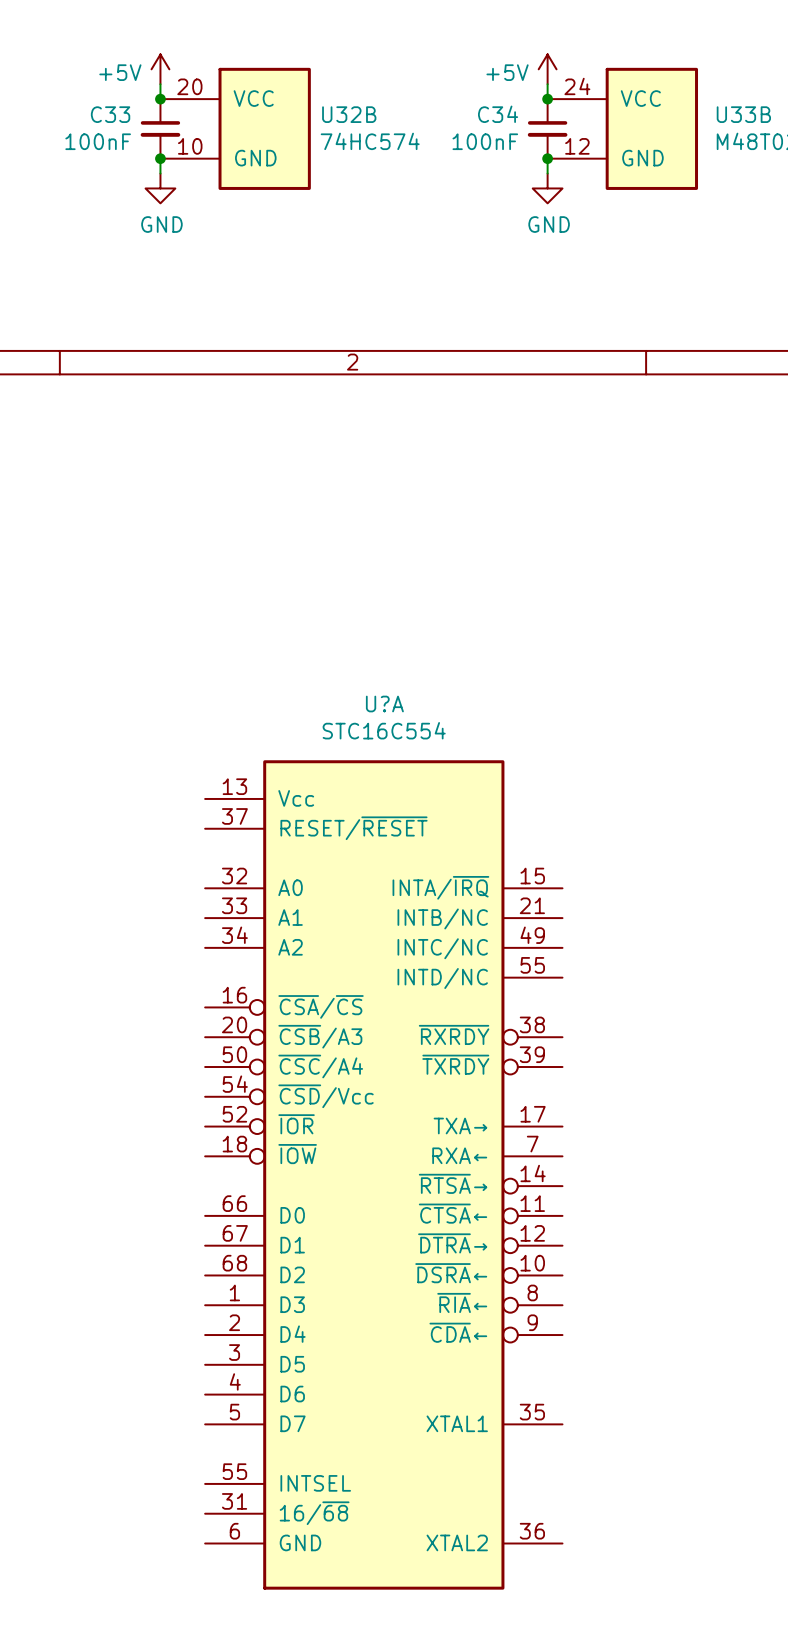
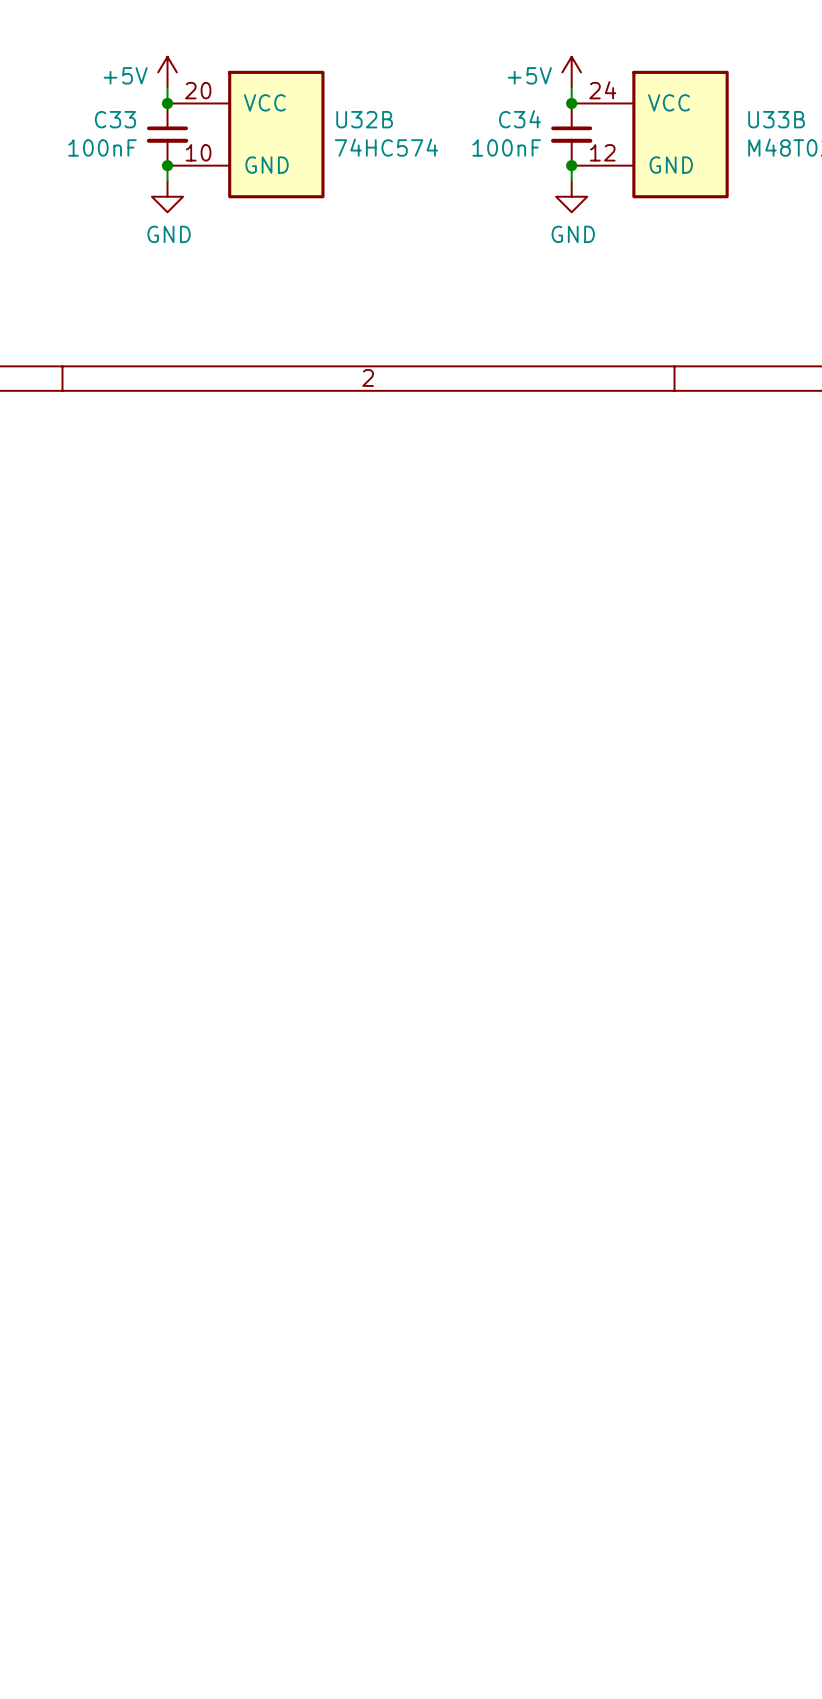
U?A: STC16C554 (383, 1174) -> none

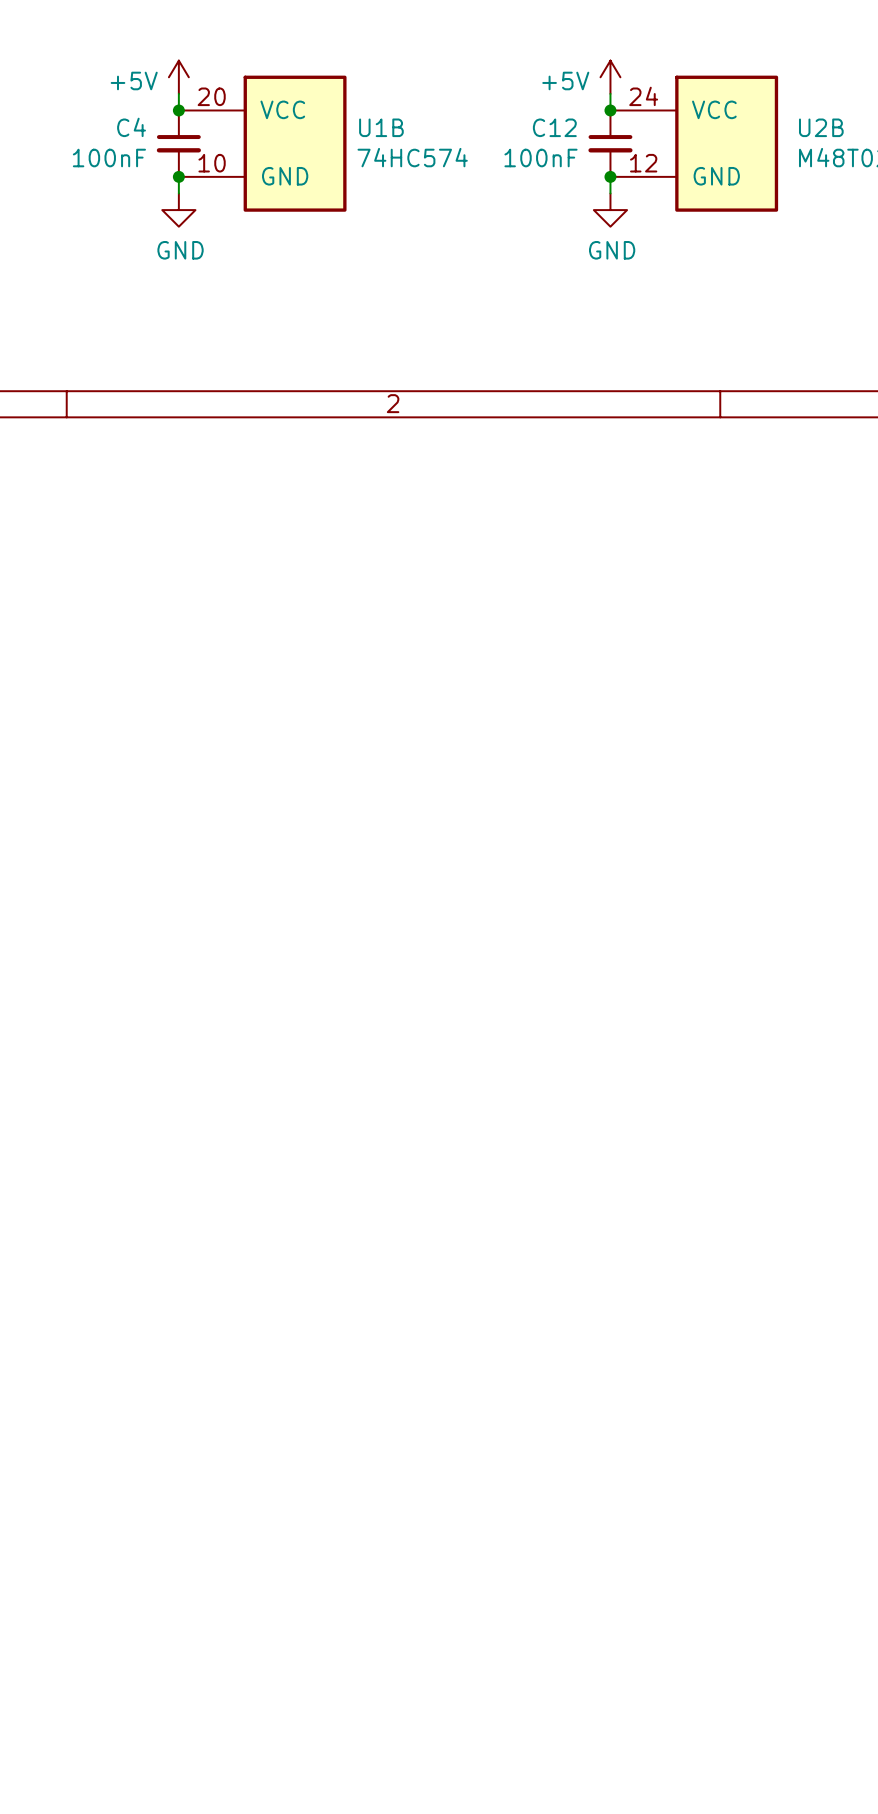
C33 name: C33 (115, 119) -> C4 (131, 127)
U32B name: U32B (364, 119) -> U1B (381, 127)
C34 name: C34 (519, 119) -> C12 (554, 127)
U33B name: U33B (776, 119) -> U2B (821, 127)

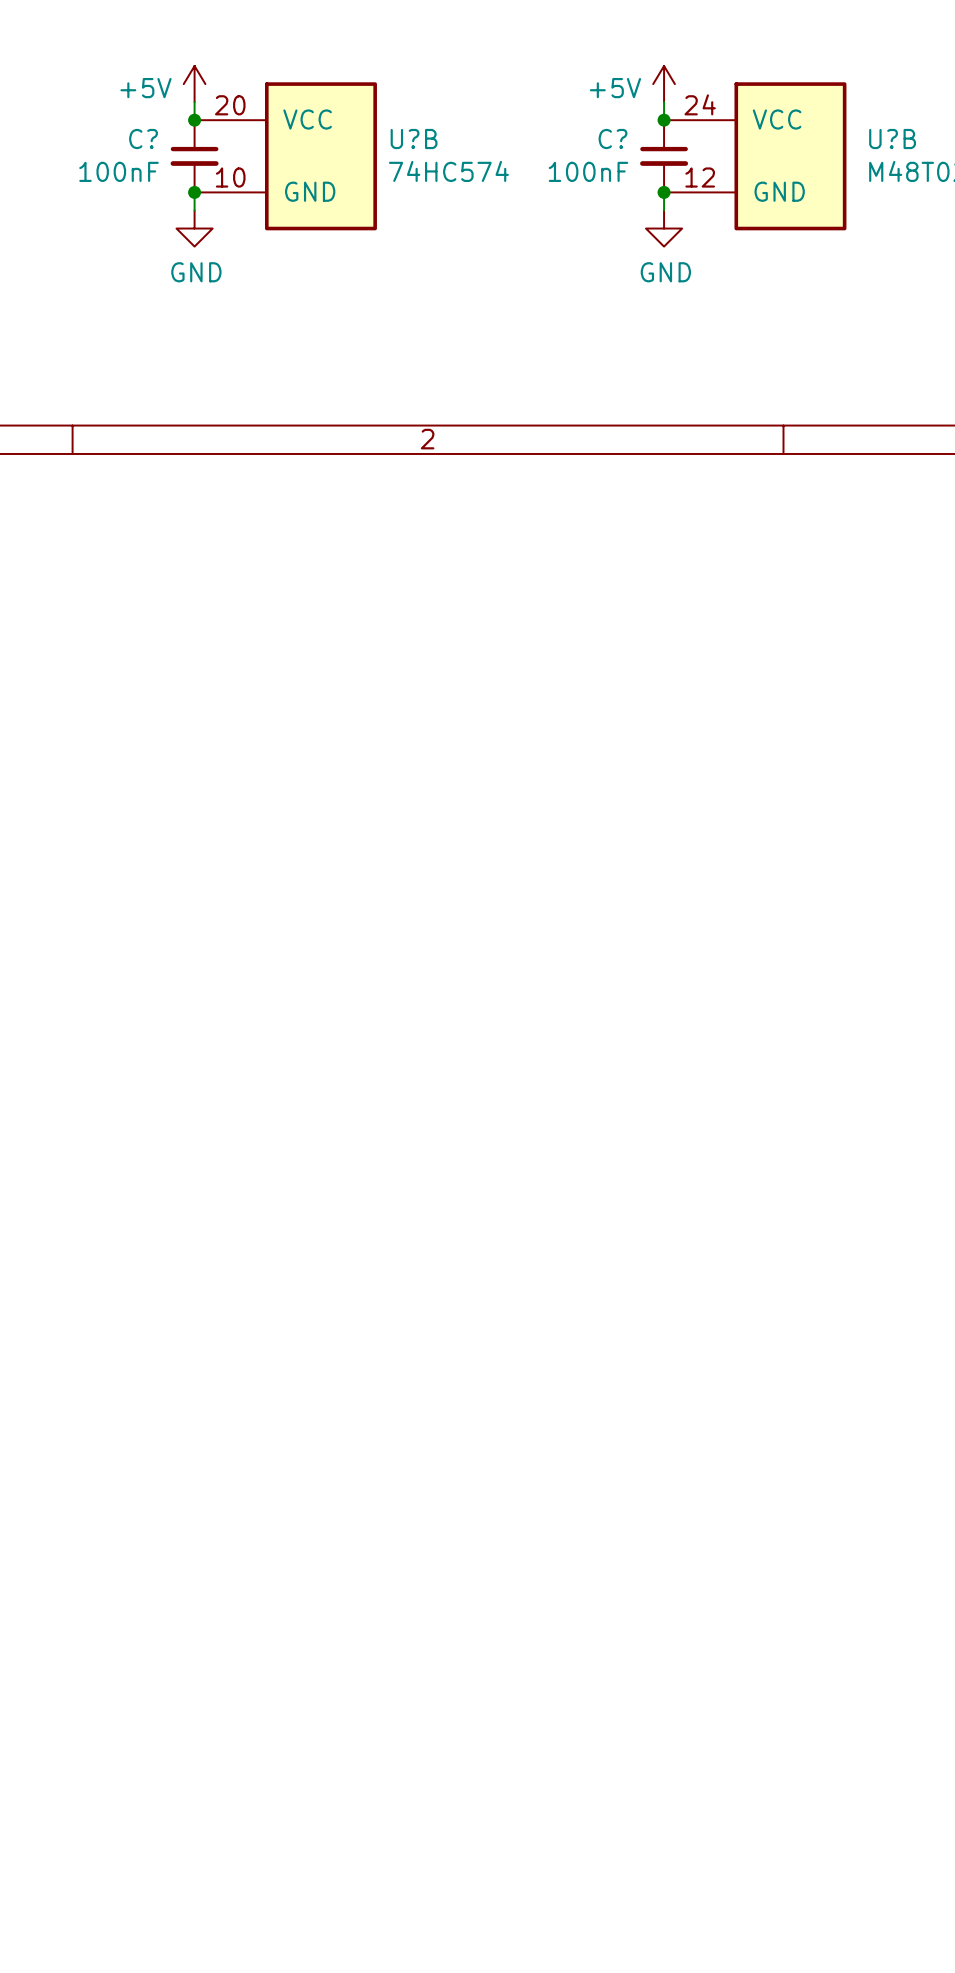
C4 name: C4 (131, 127) -> C? (143, 139)
U1B name: U1B (381, 127) -> U?B (414, 139)
C12 name: C12 (554, 127) -> C? (613, 139)
U2B name: U2B (821, 127) -> U?B (892, 139)

